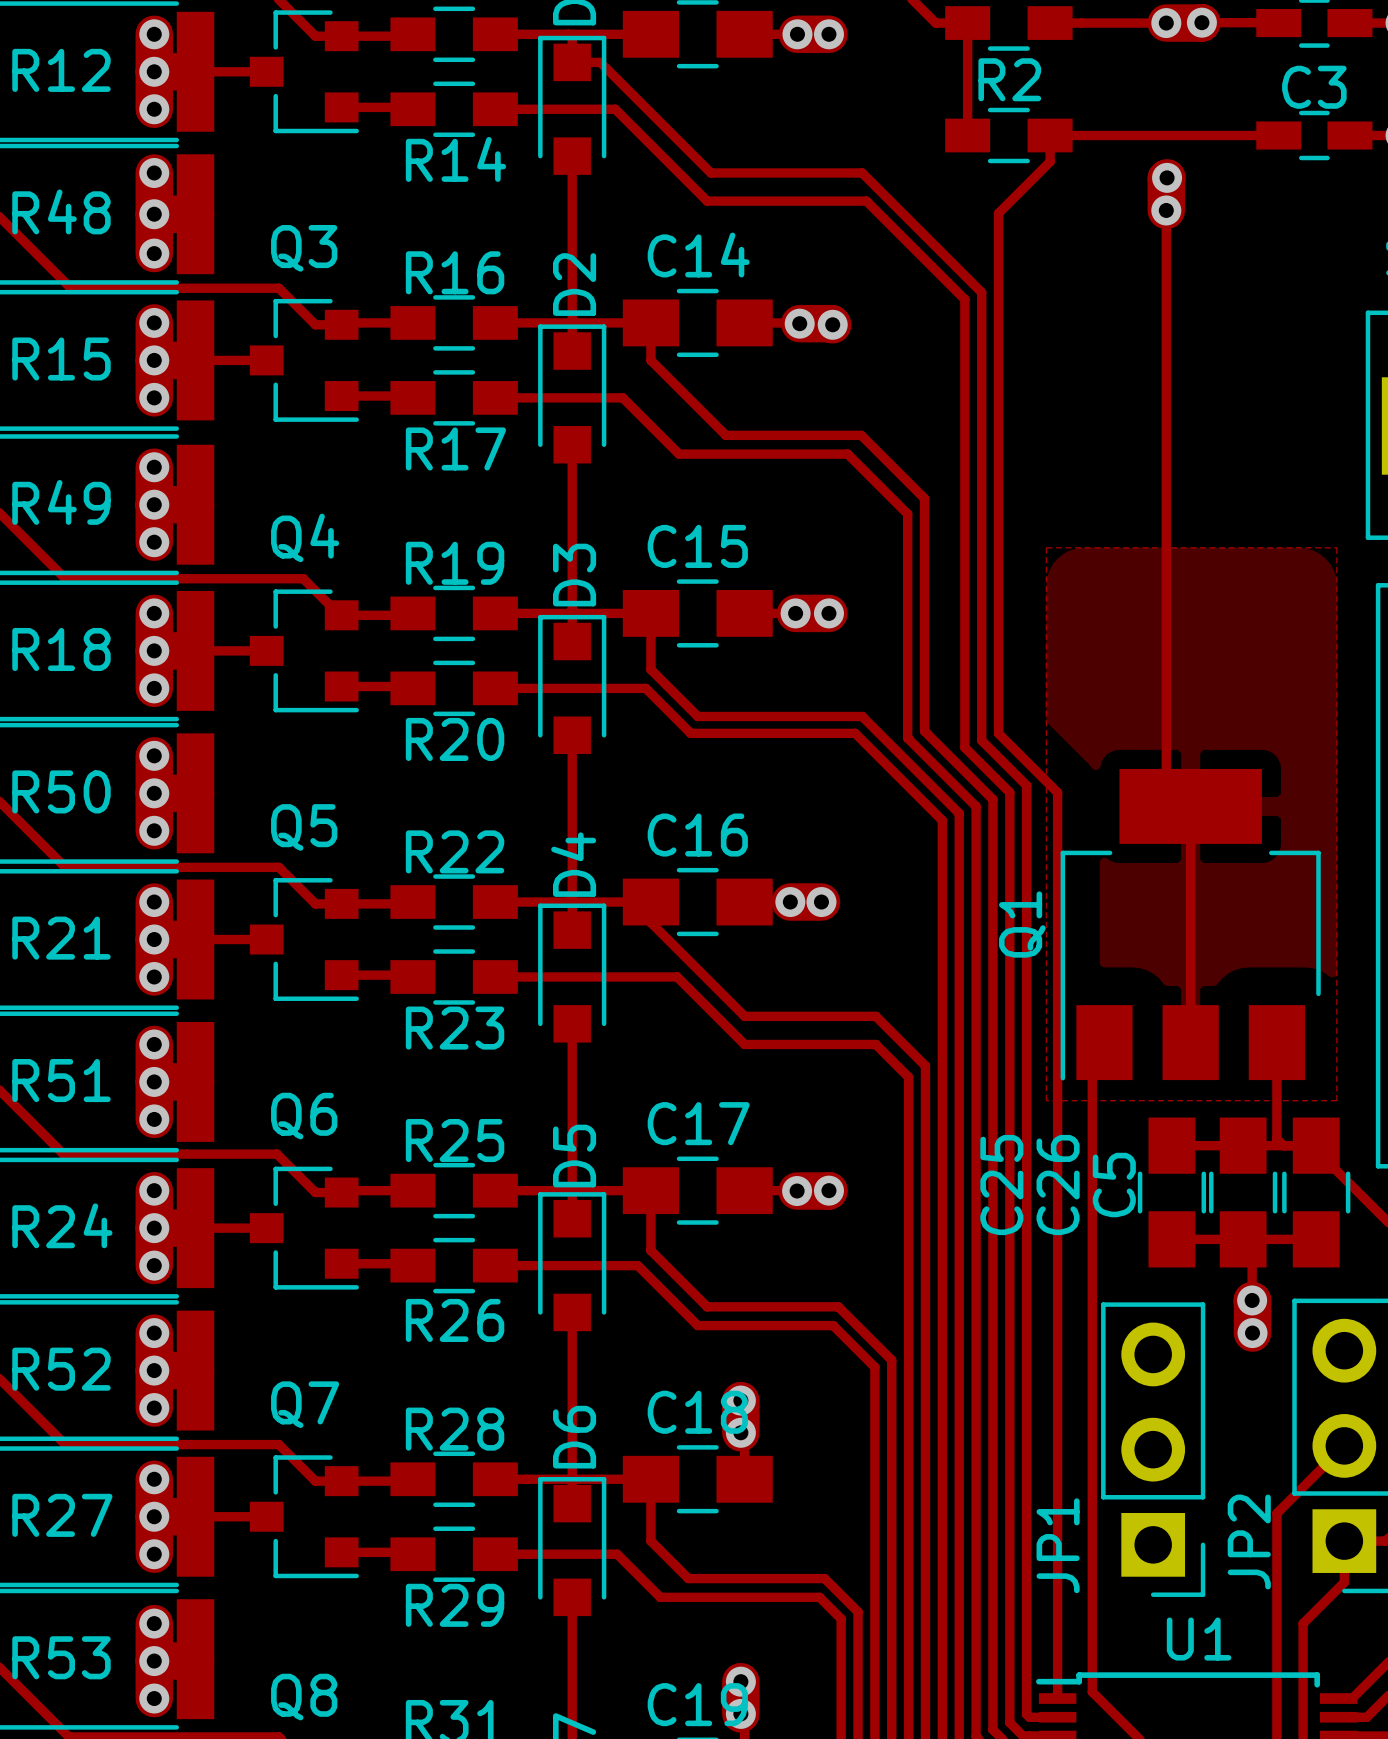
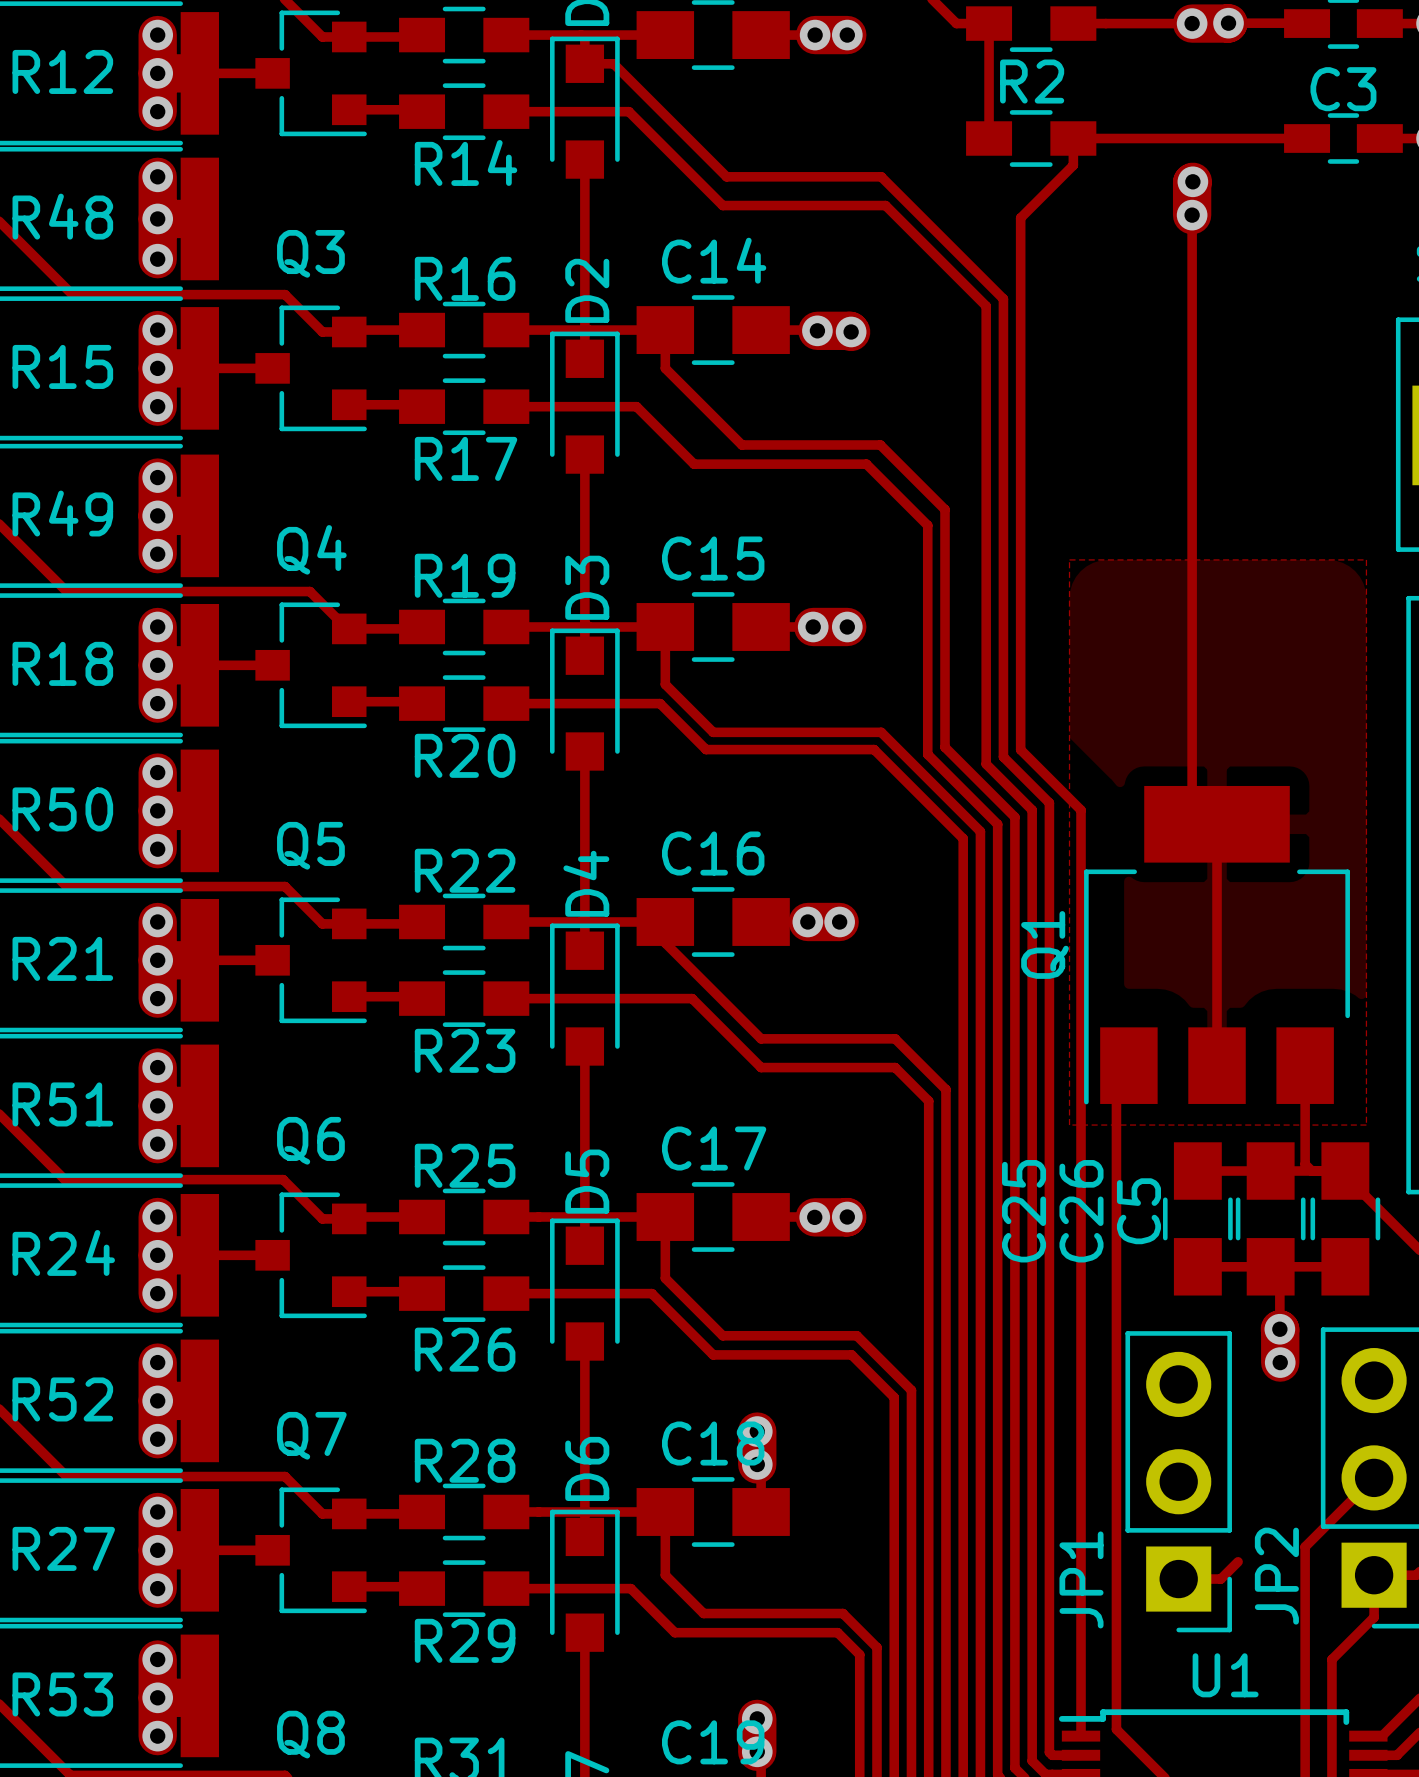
track: none -> (1238, 1561) (1220, 1579) (1178, 1579)

